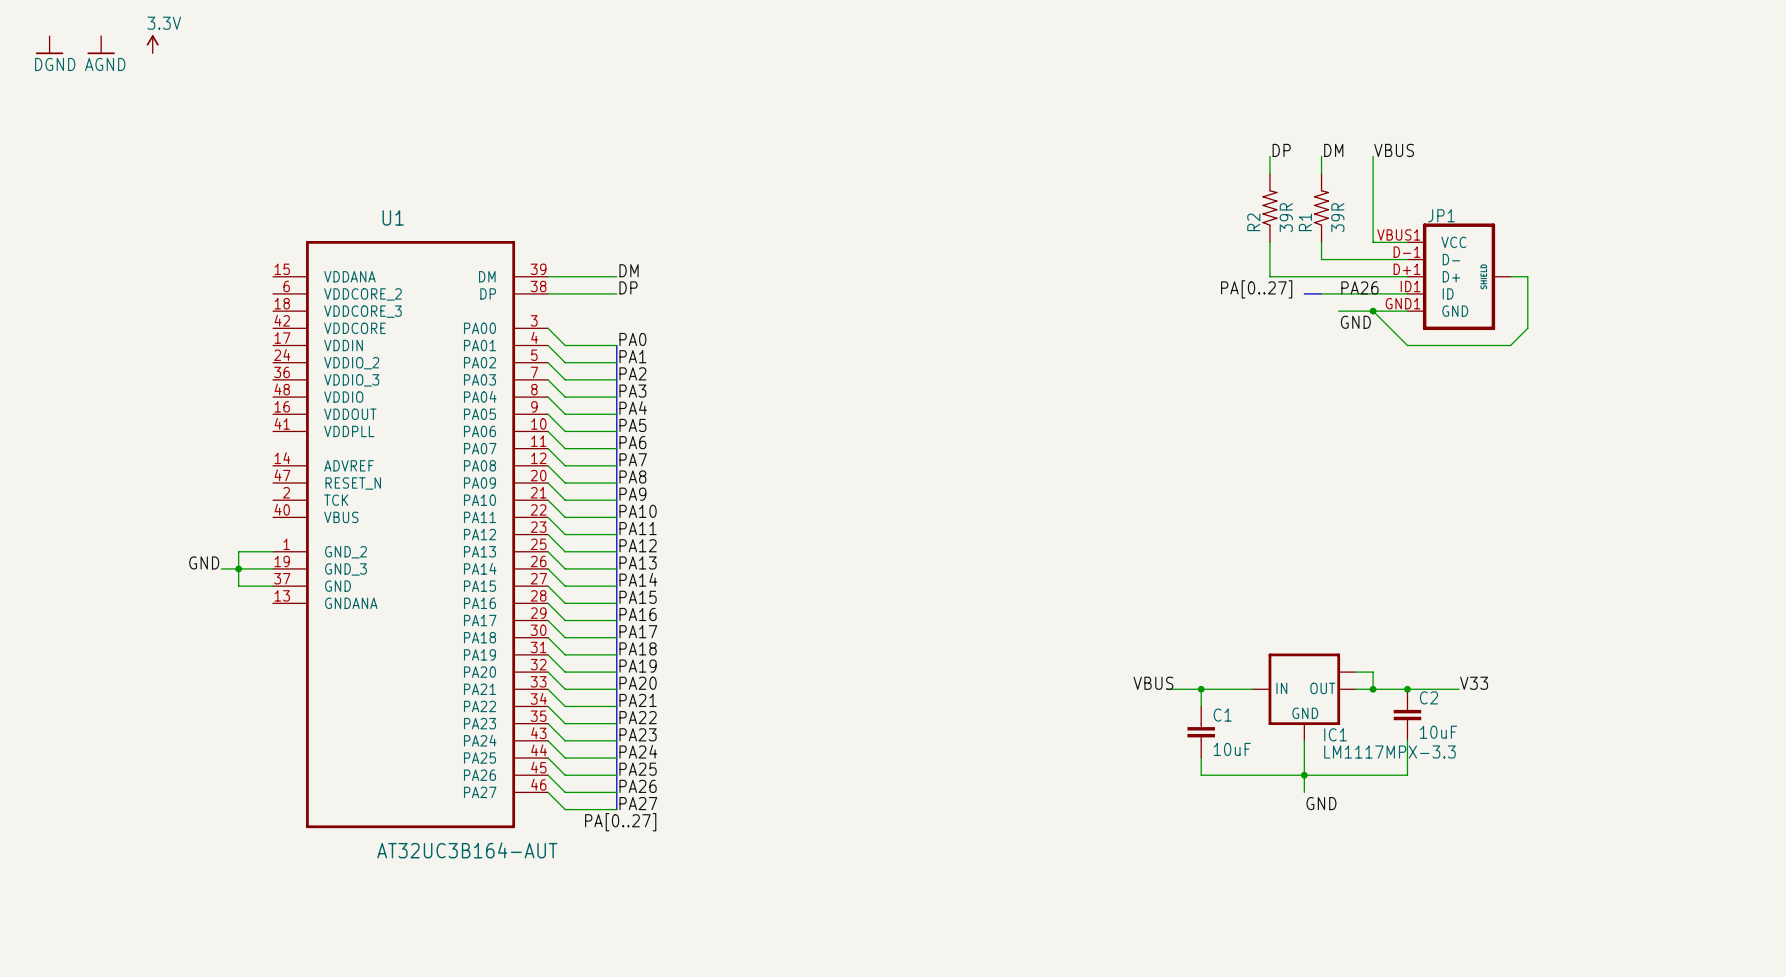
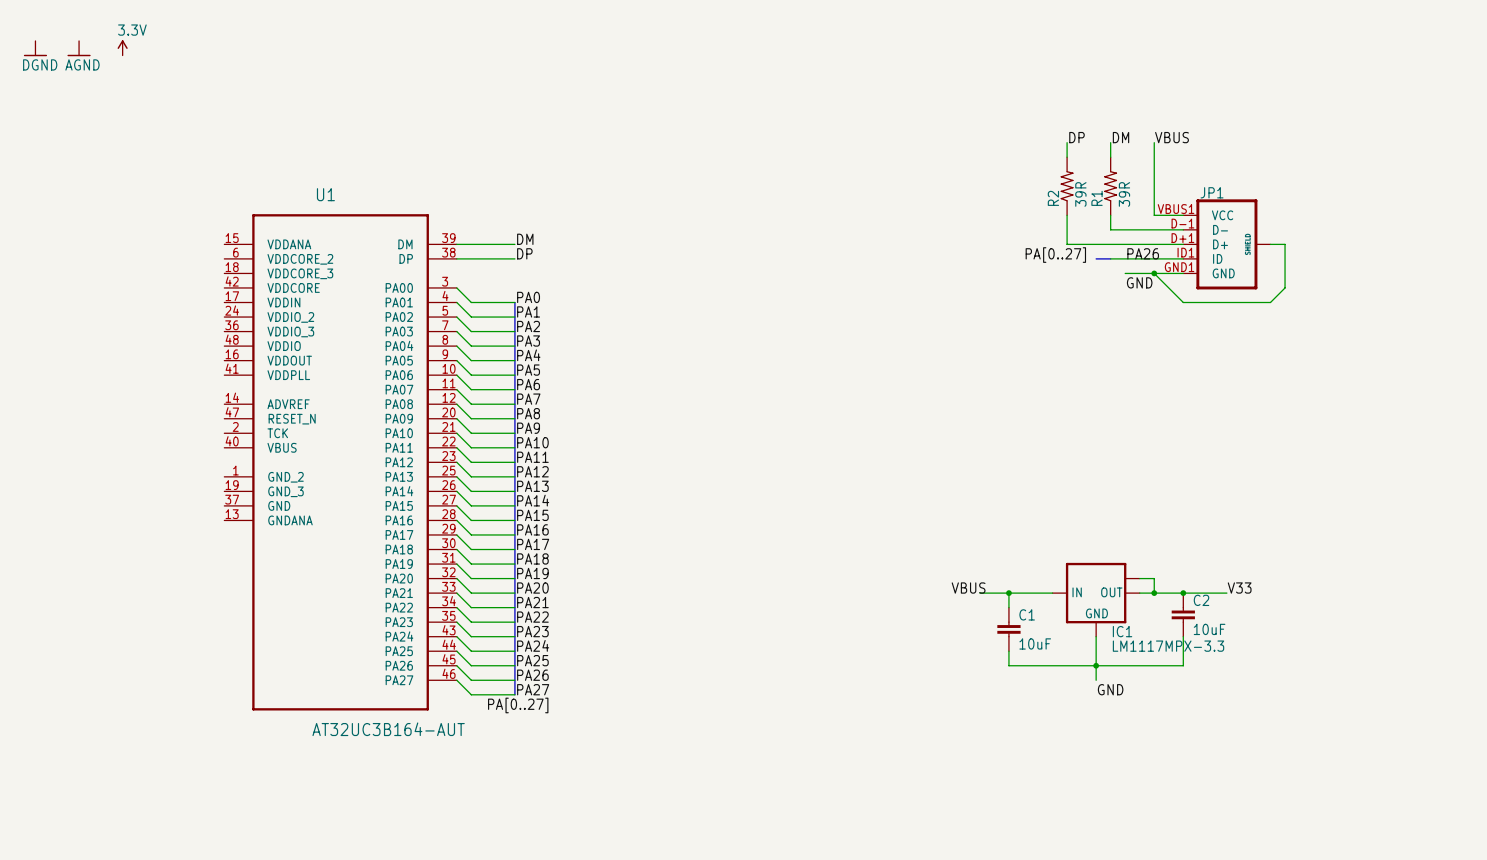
wire: (273, 551) (238, 551) (238, 586) (273, 586) -> none
label: GND (204, 562) -> none
wire: (221, 568) (273, 568) -> none
junction: (238, 568) -> none

